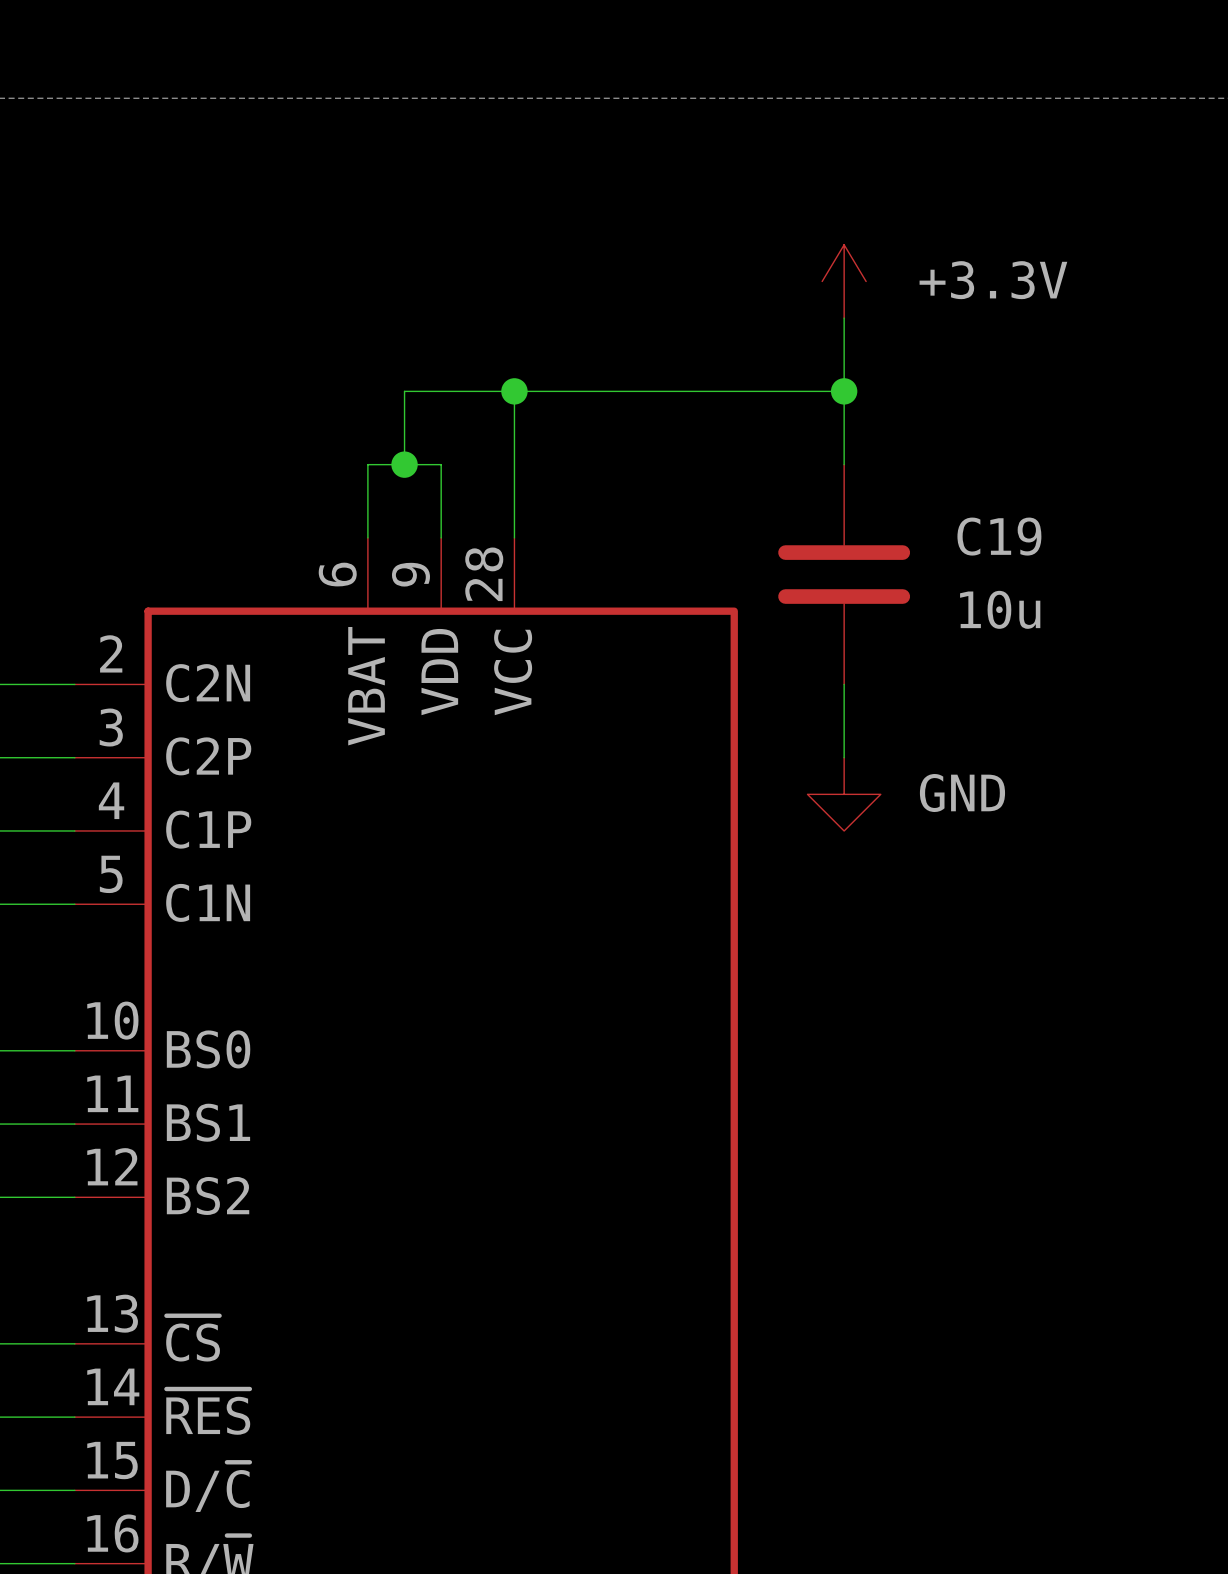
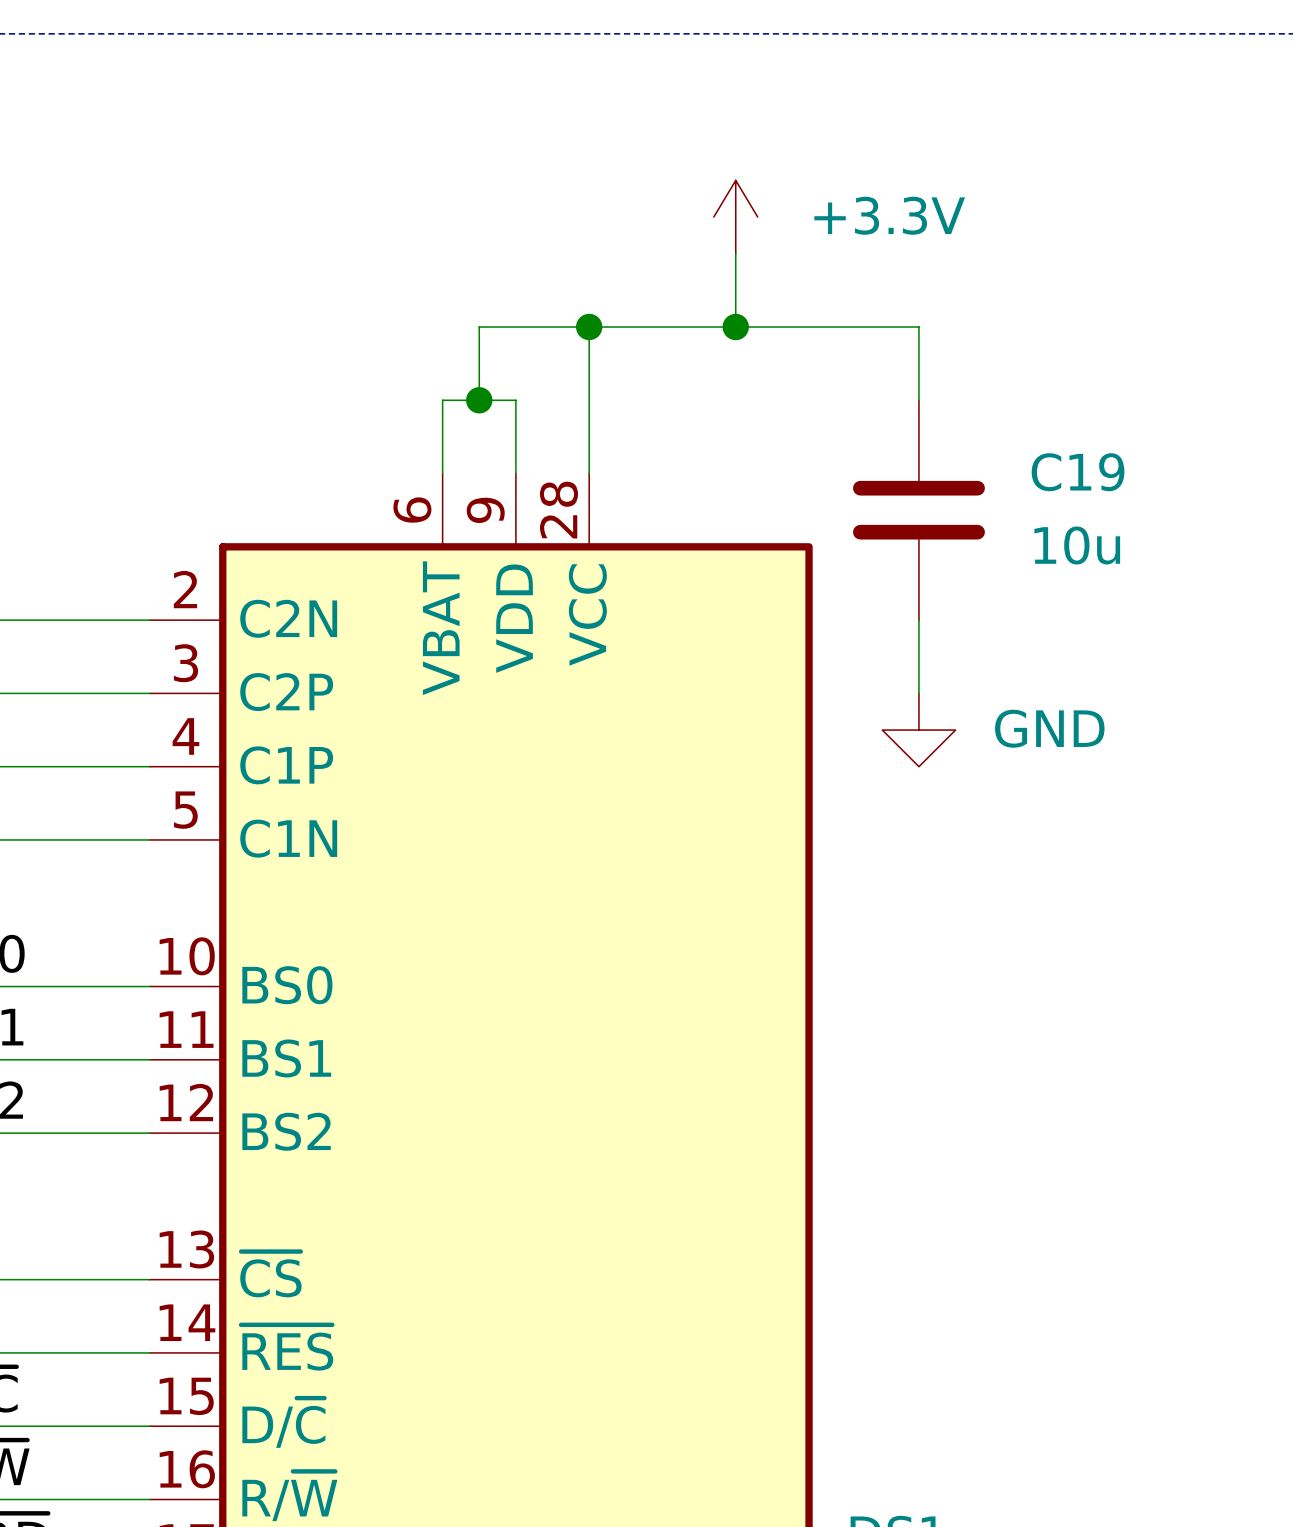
power symbol position: +3.3V (844, 281) -> +3.3V (735, 217)
wire: (844, 318) (844, 391) -> (735, 253) (735, 327)
junction: none -> (735, 327)
junction: (844, 391) -> none

